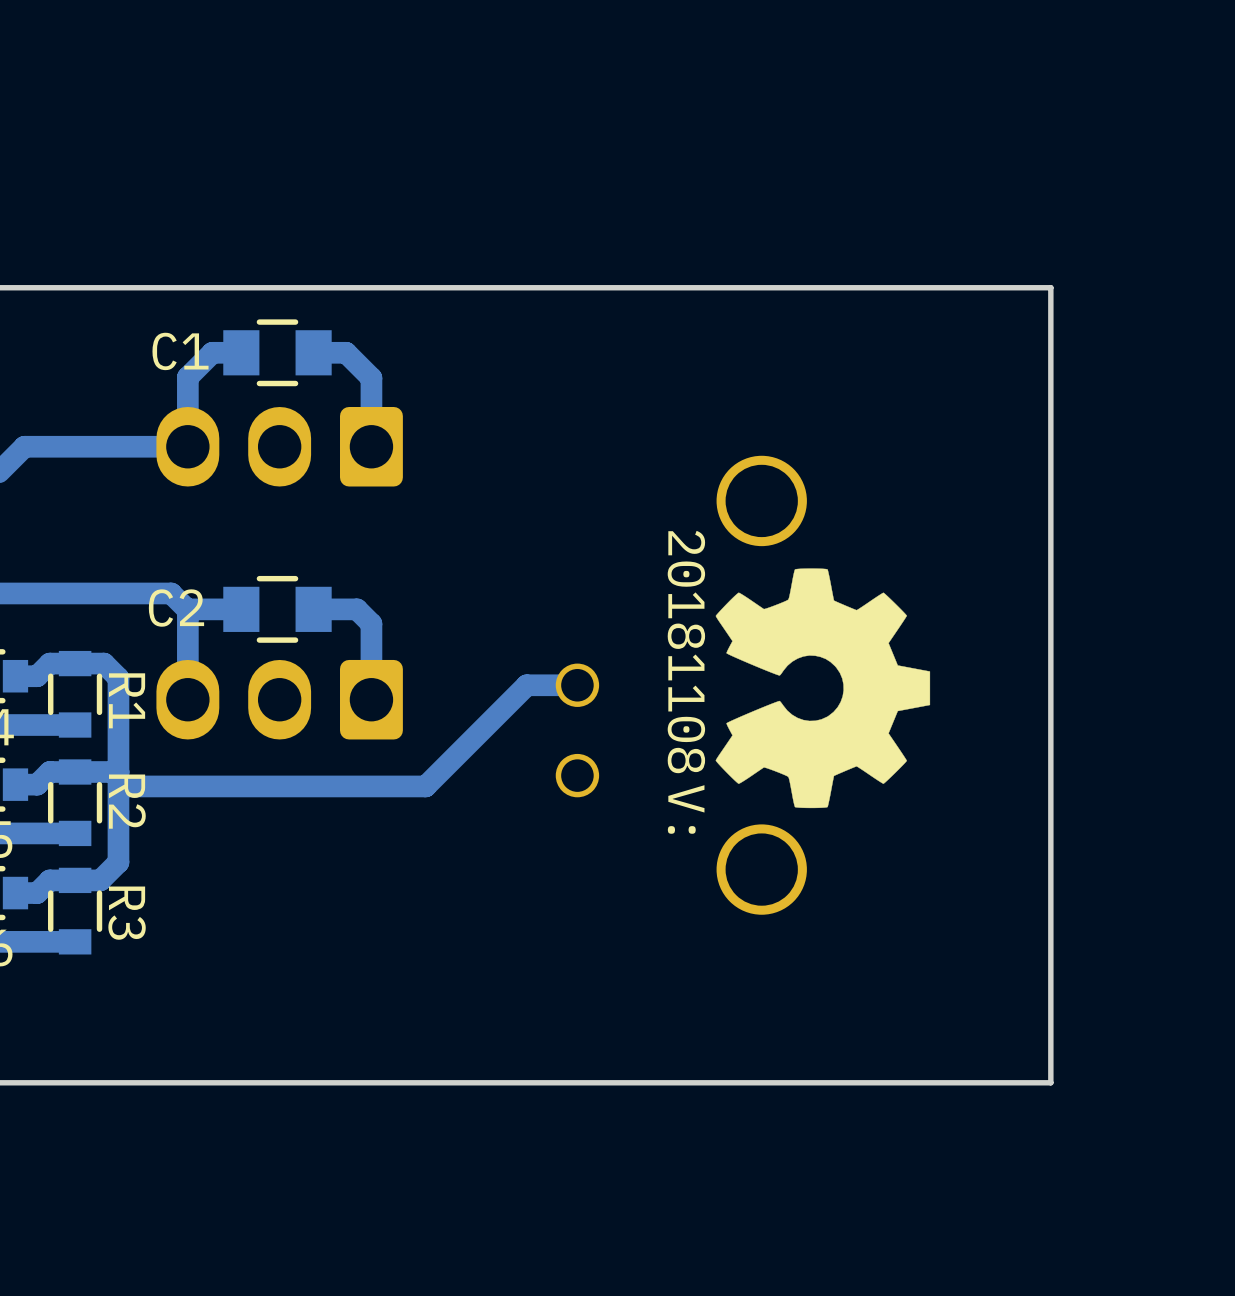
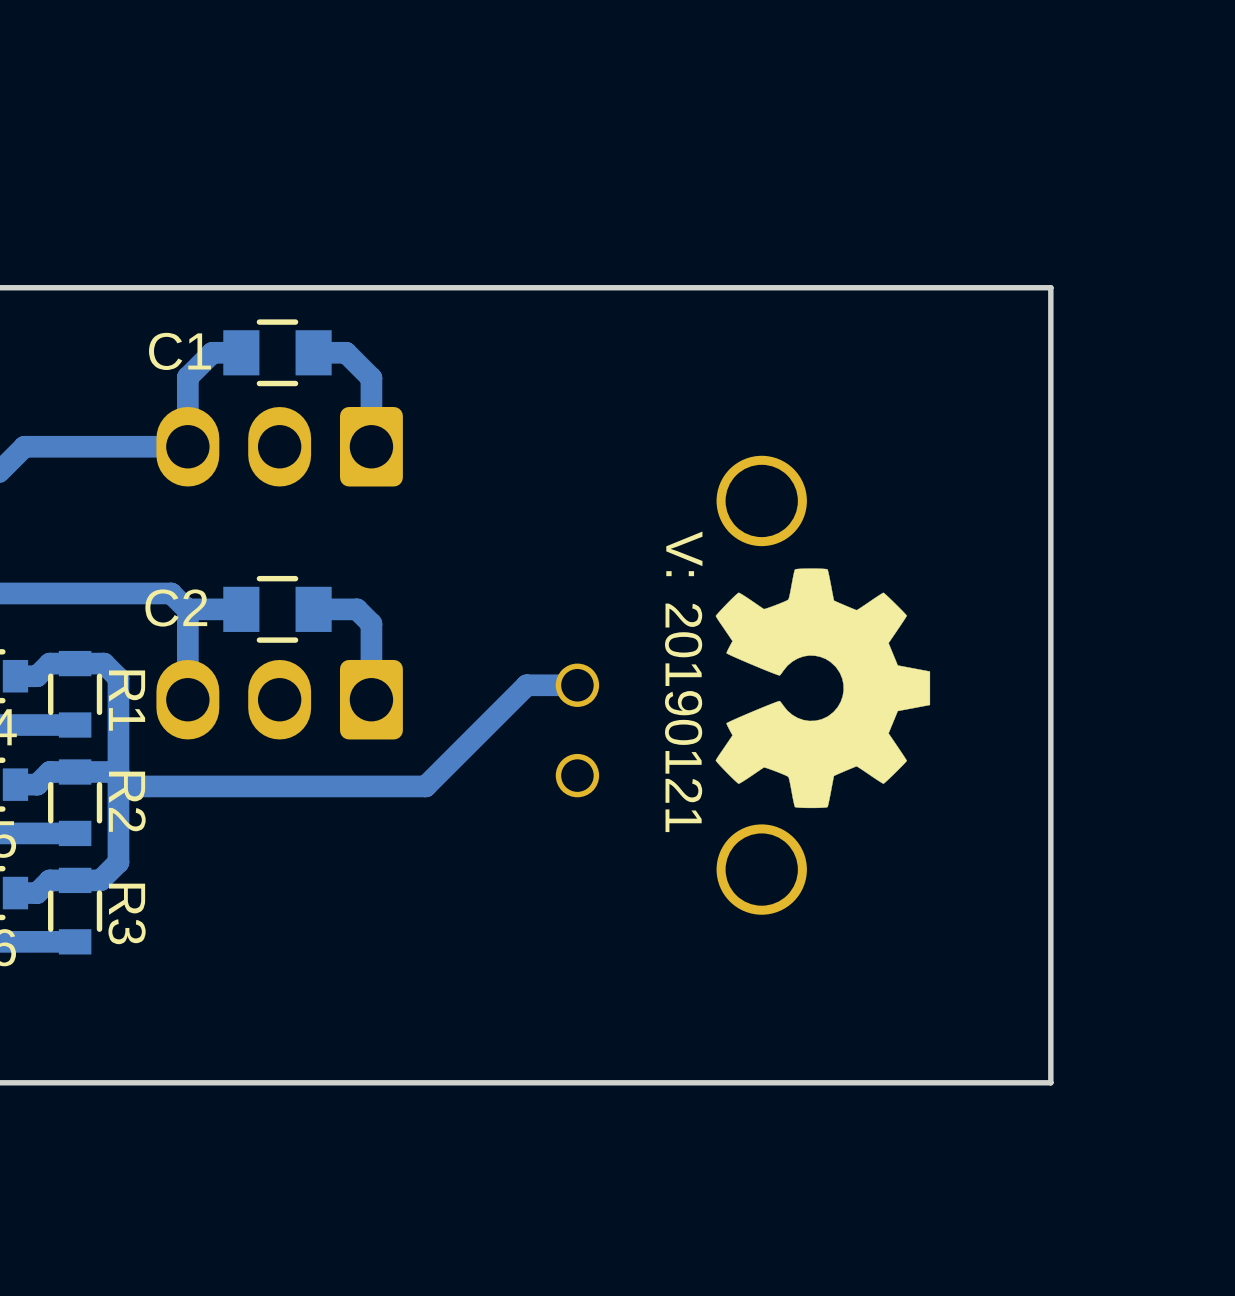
drawing shape: [667, 530, 706, 834] -> [664, 531, 703, 833]

